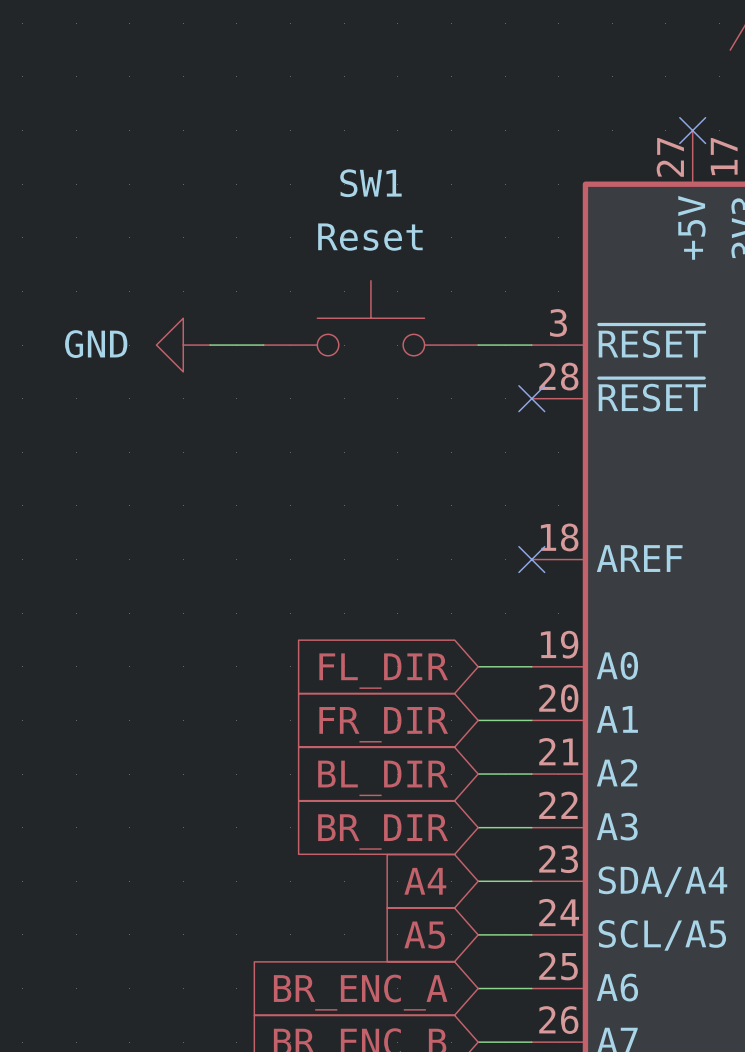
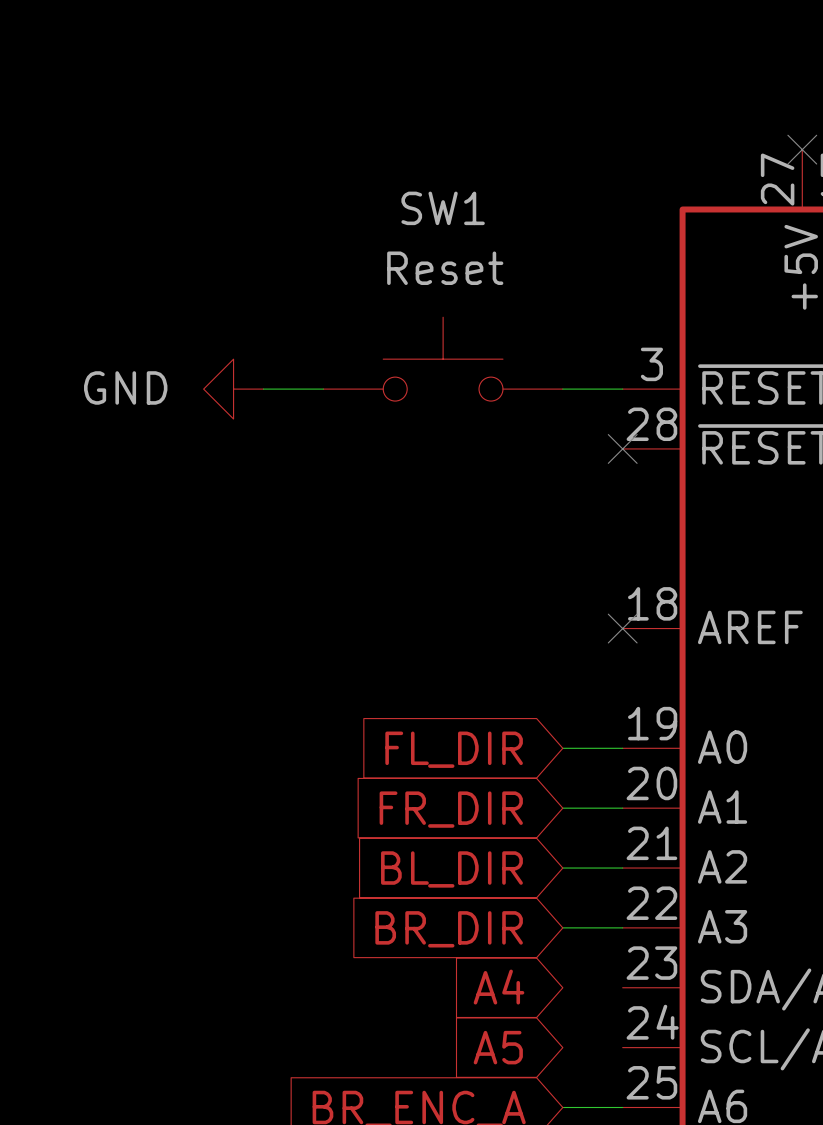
wire: (478, 881) (531, 881) -> none
wire: (478, 934) (531, 934) -> none

